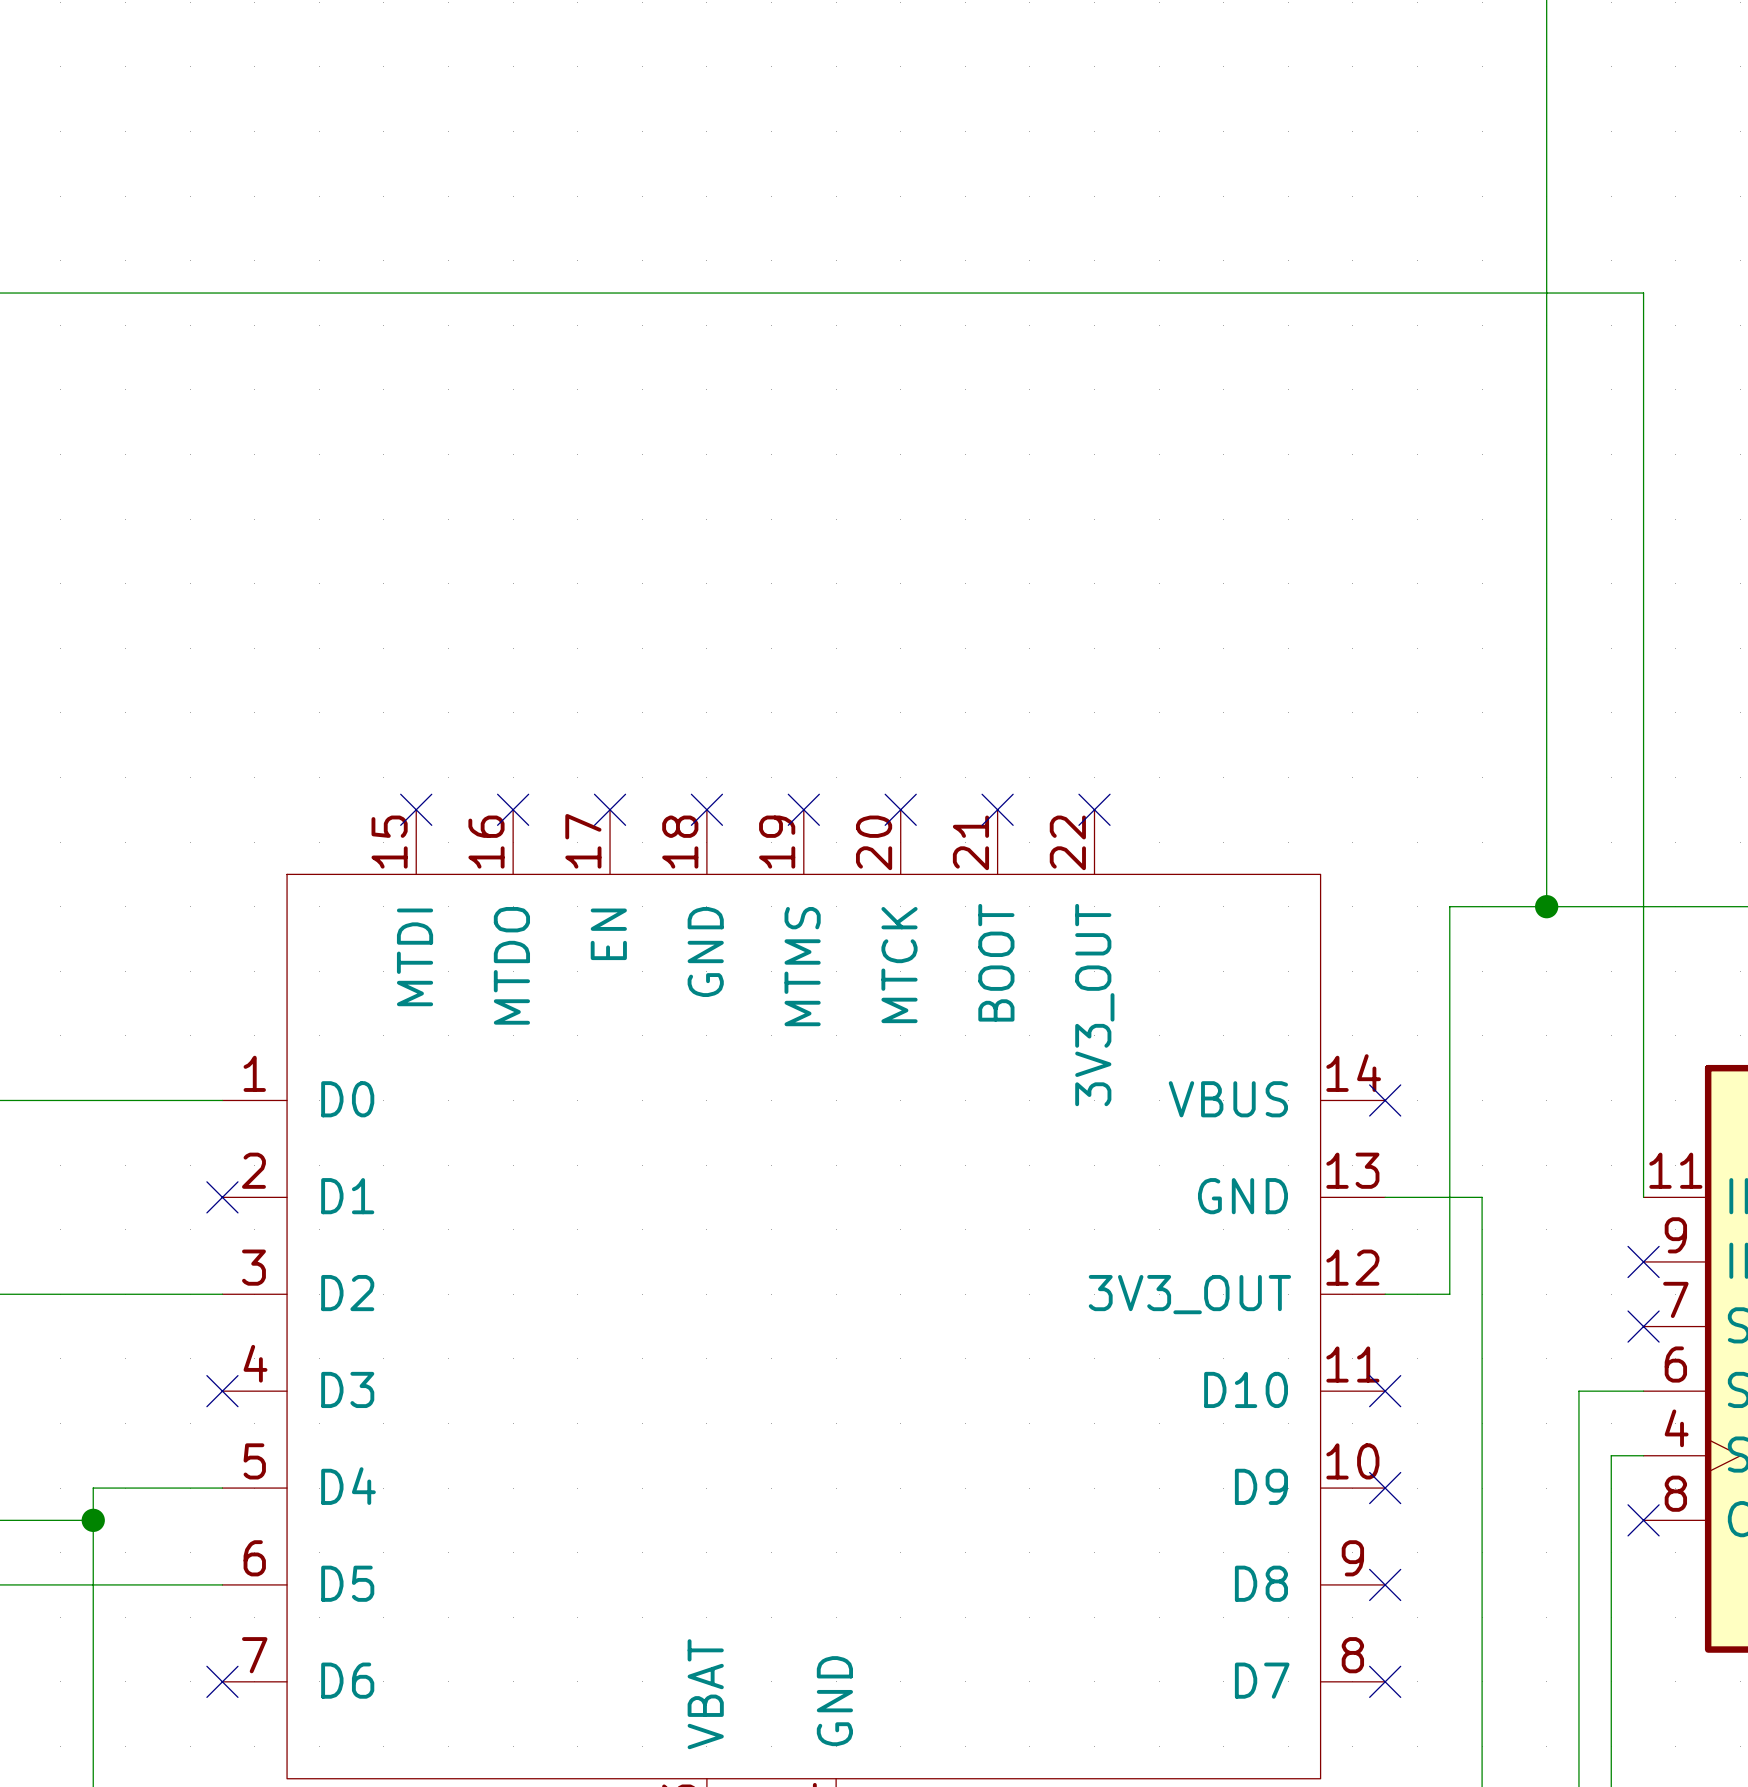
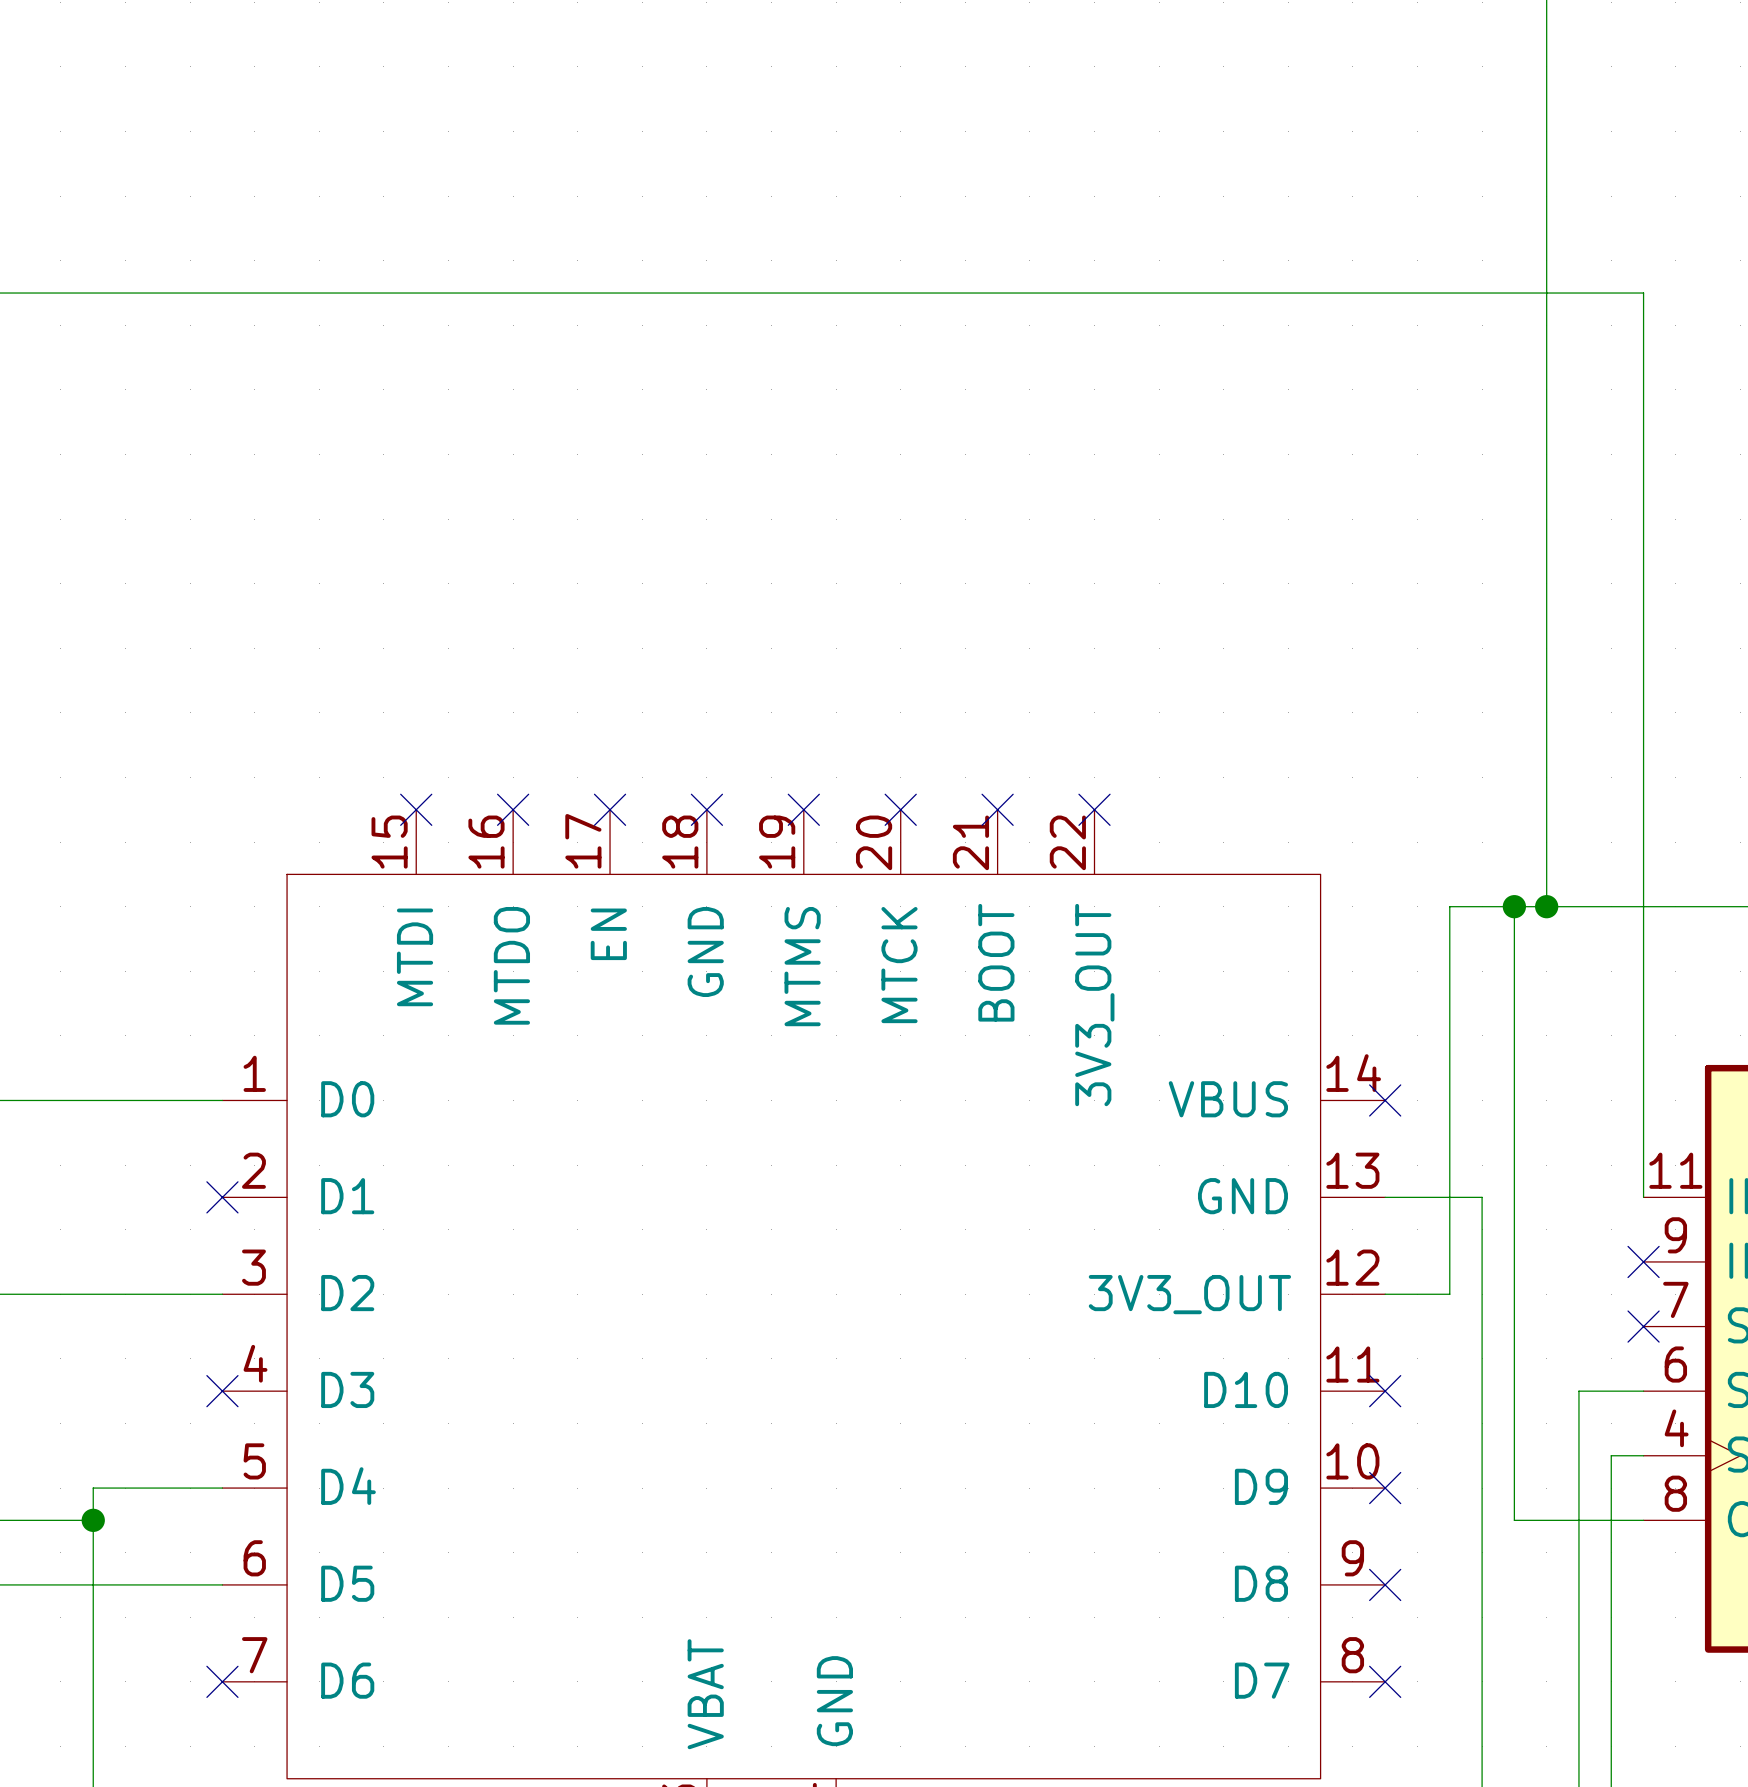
wire: none -> (1514, 906) (1514, 1520) (1643, 1520)
junction: none -> (1514, 906)
no-connect mark: (1643, 1520) -> none

